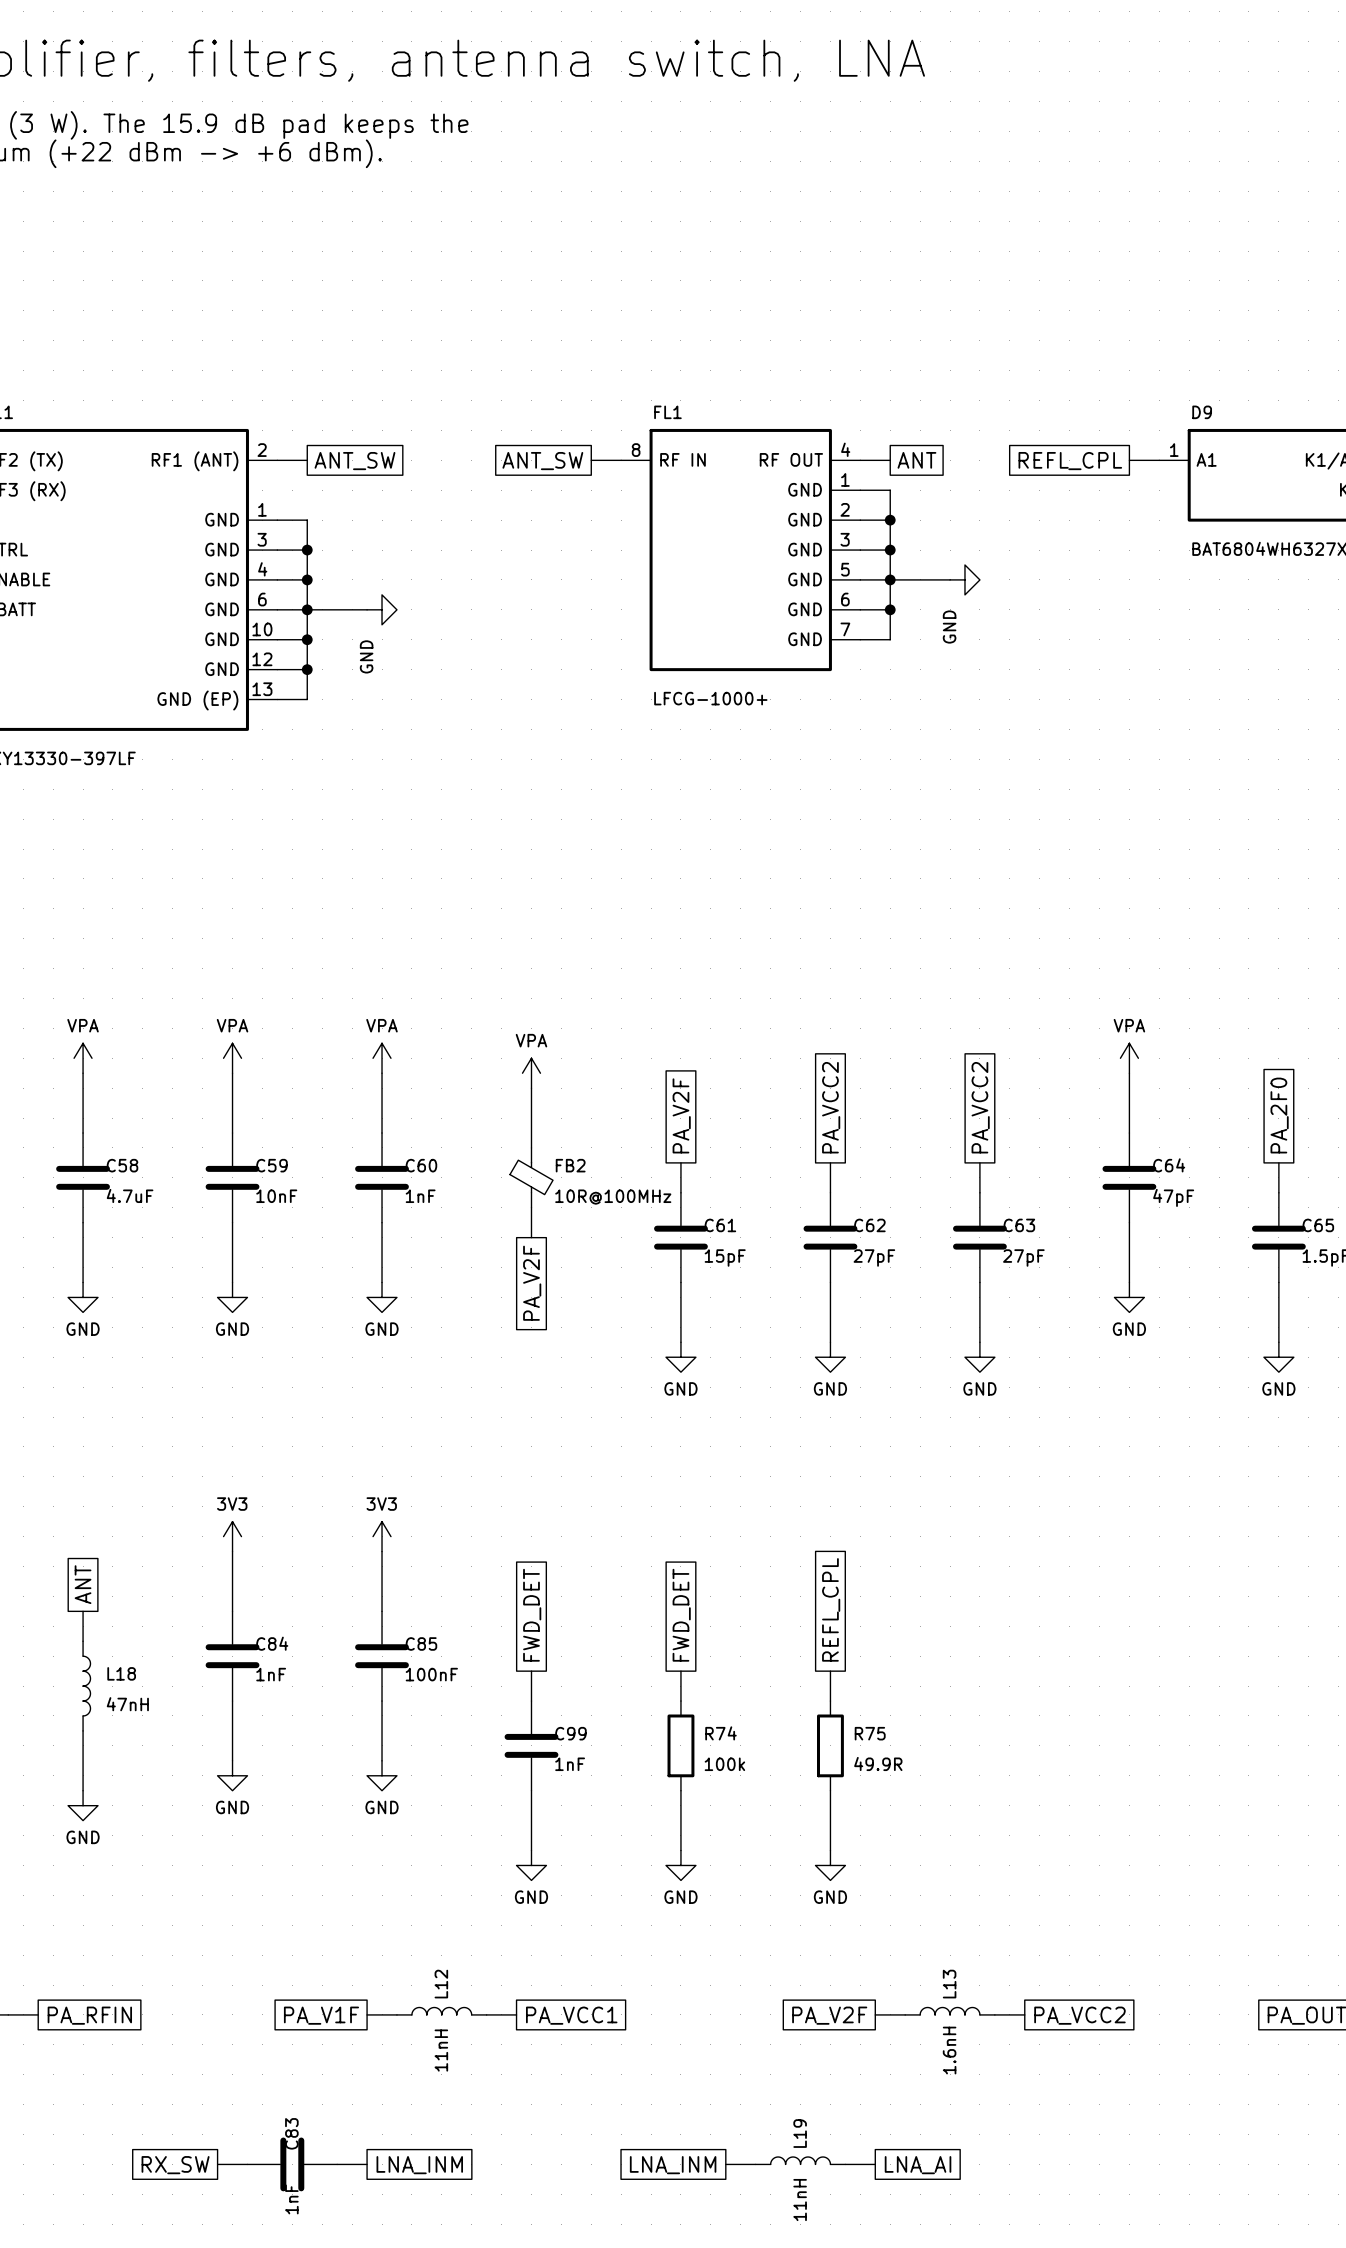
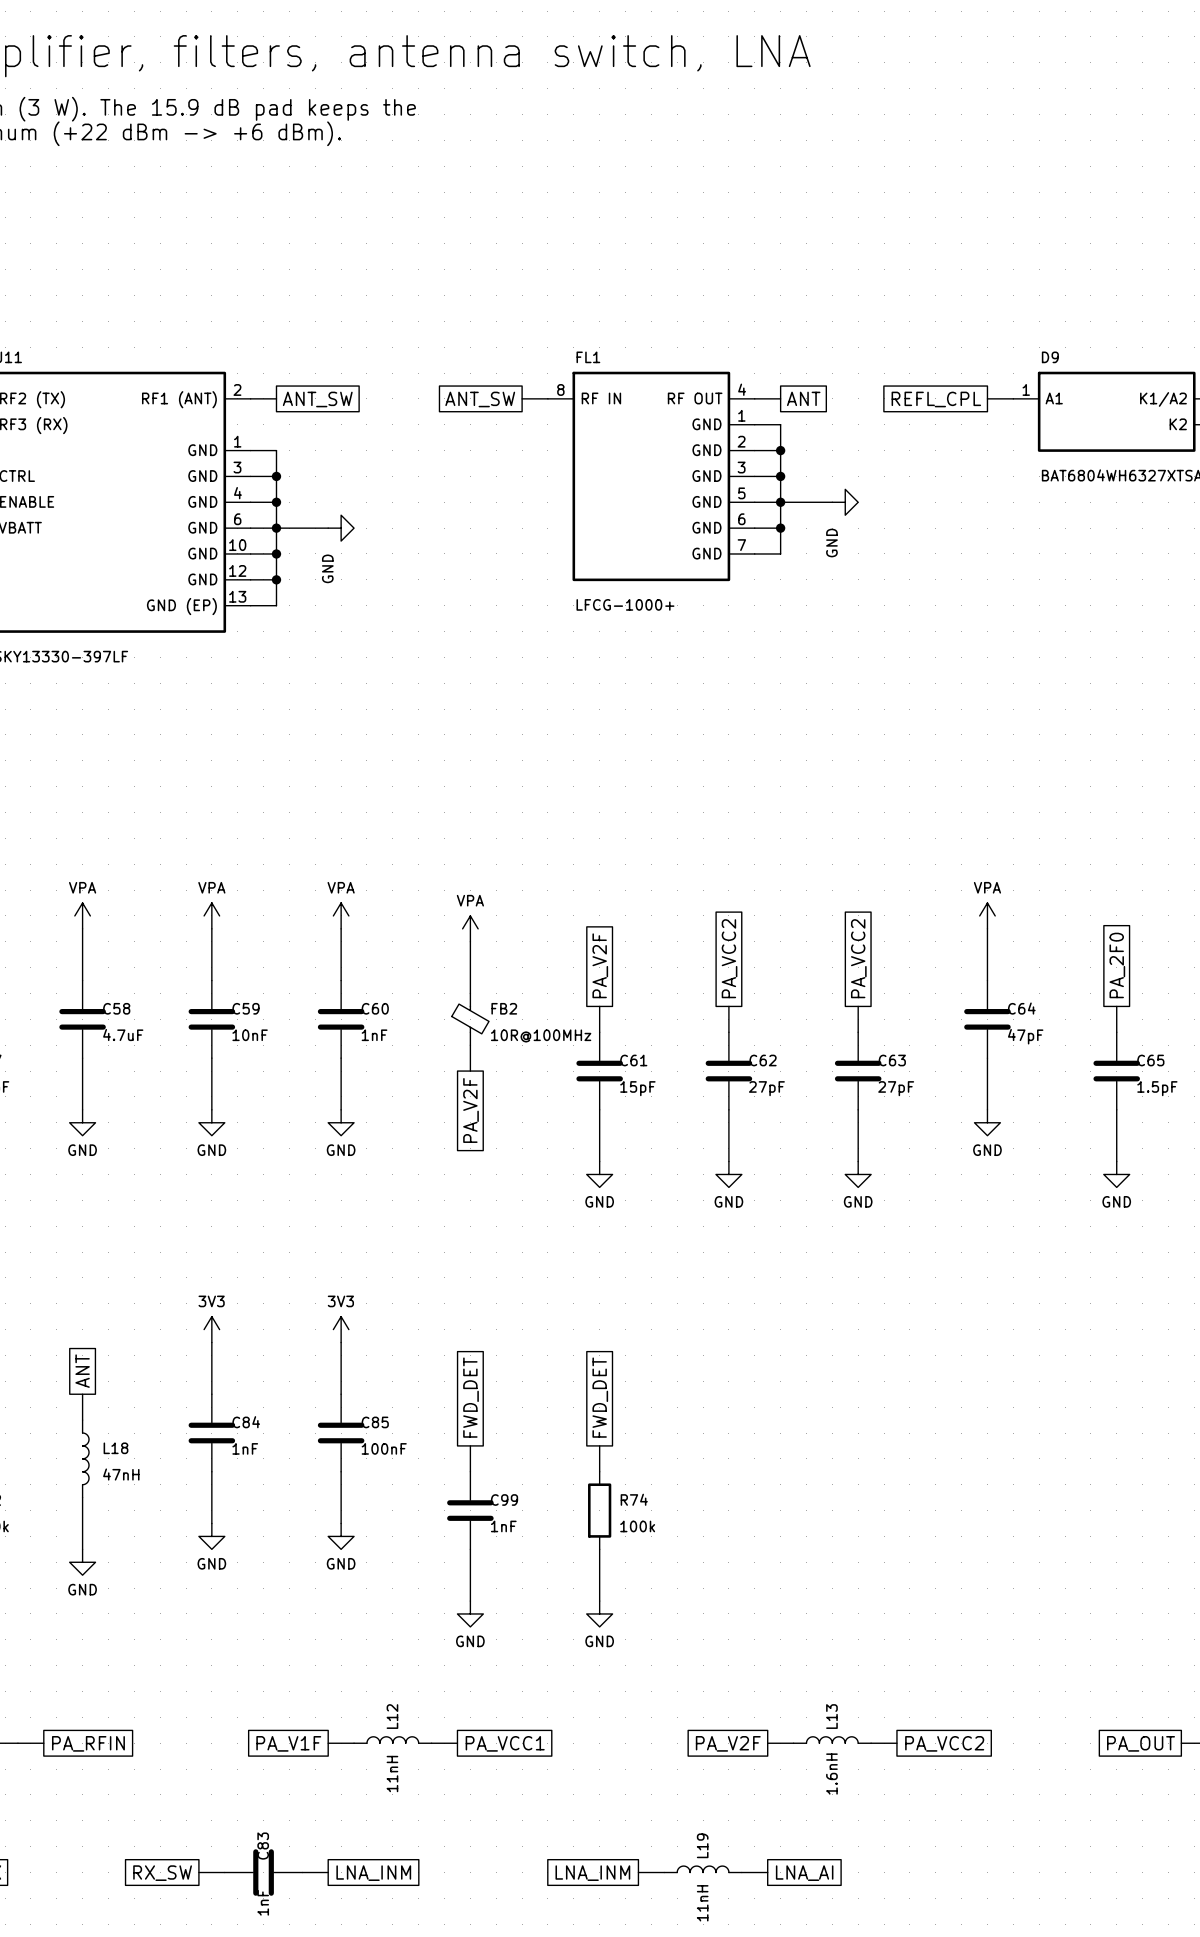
global label: REFL_CPL (831, 1609) -> none
wire: (830, 1671) (830, 1701) -> none
R75: 49.9R (830, 1745) -> none
wire: (830, 1790) (830, 1850) -> none
power symbol: GND (830, 1865) -> none

